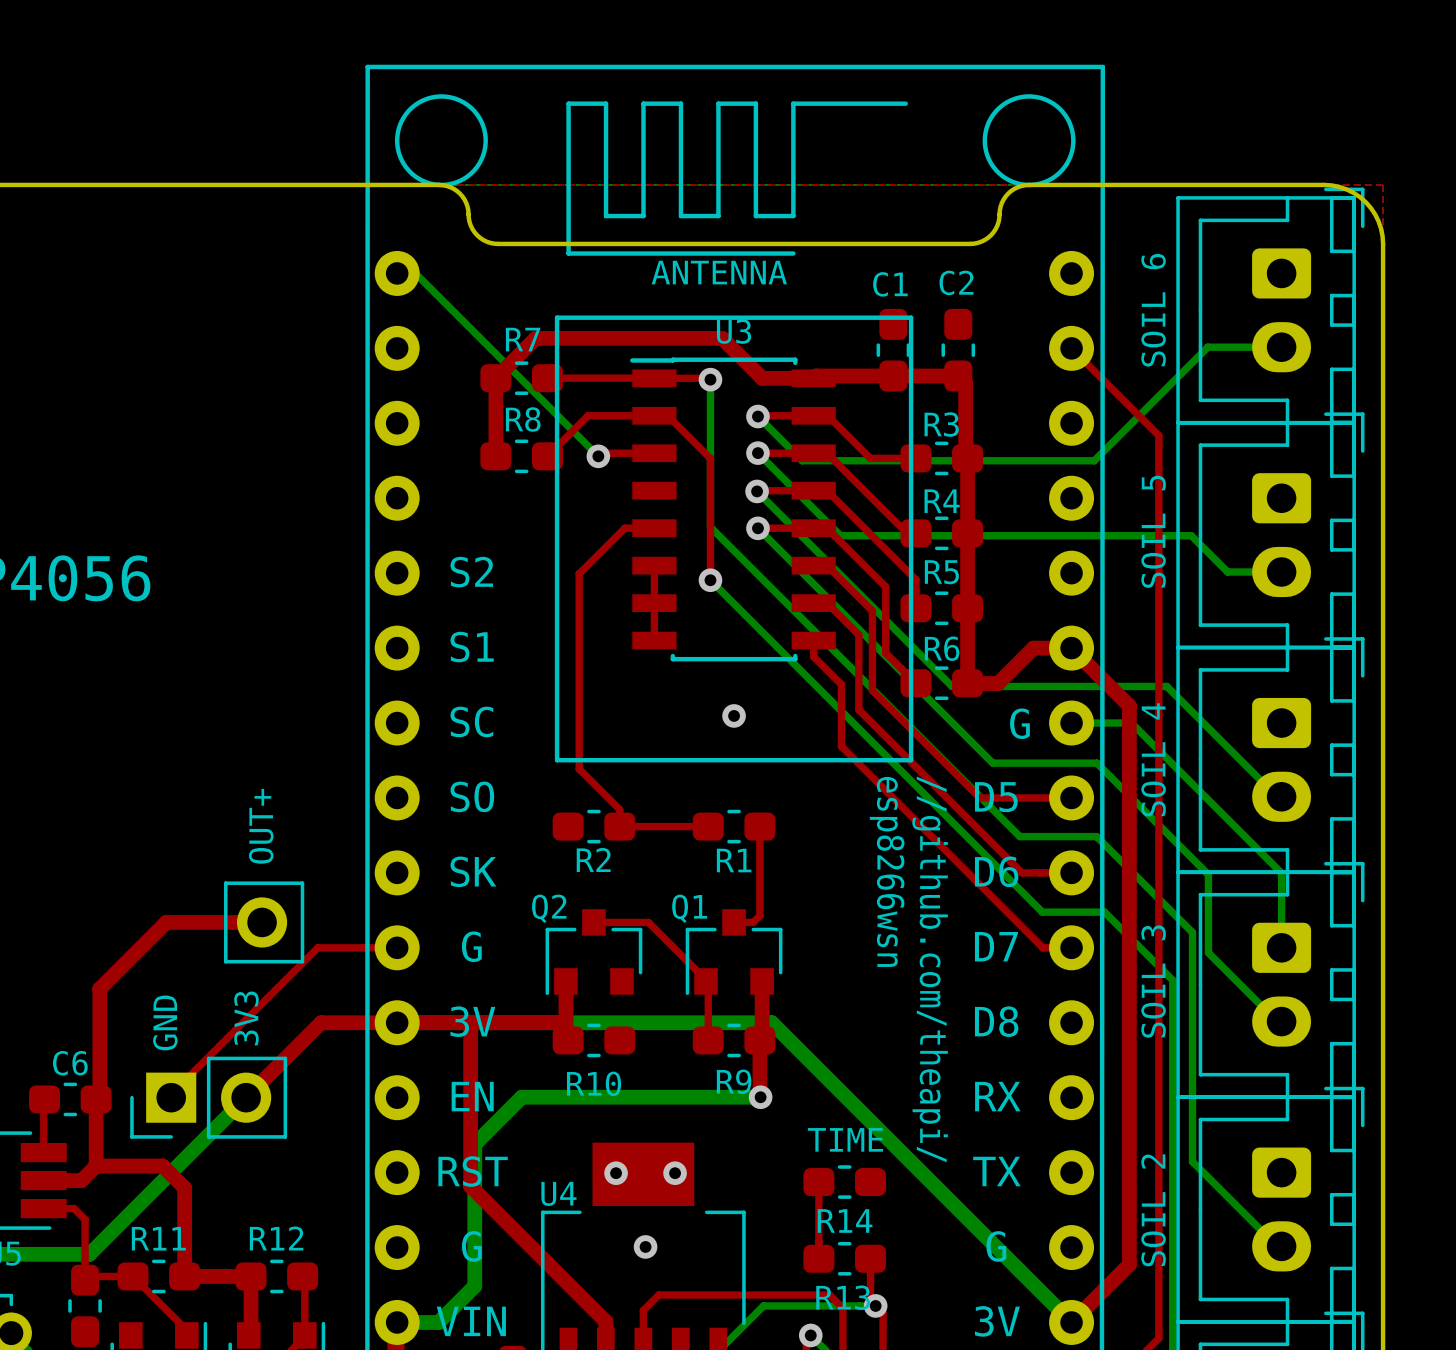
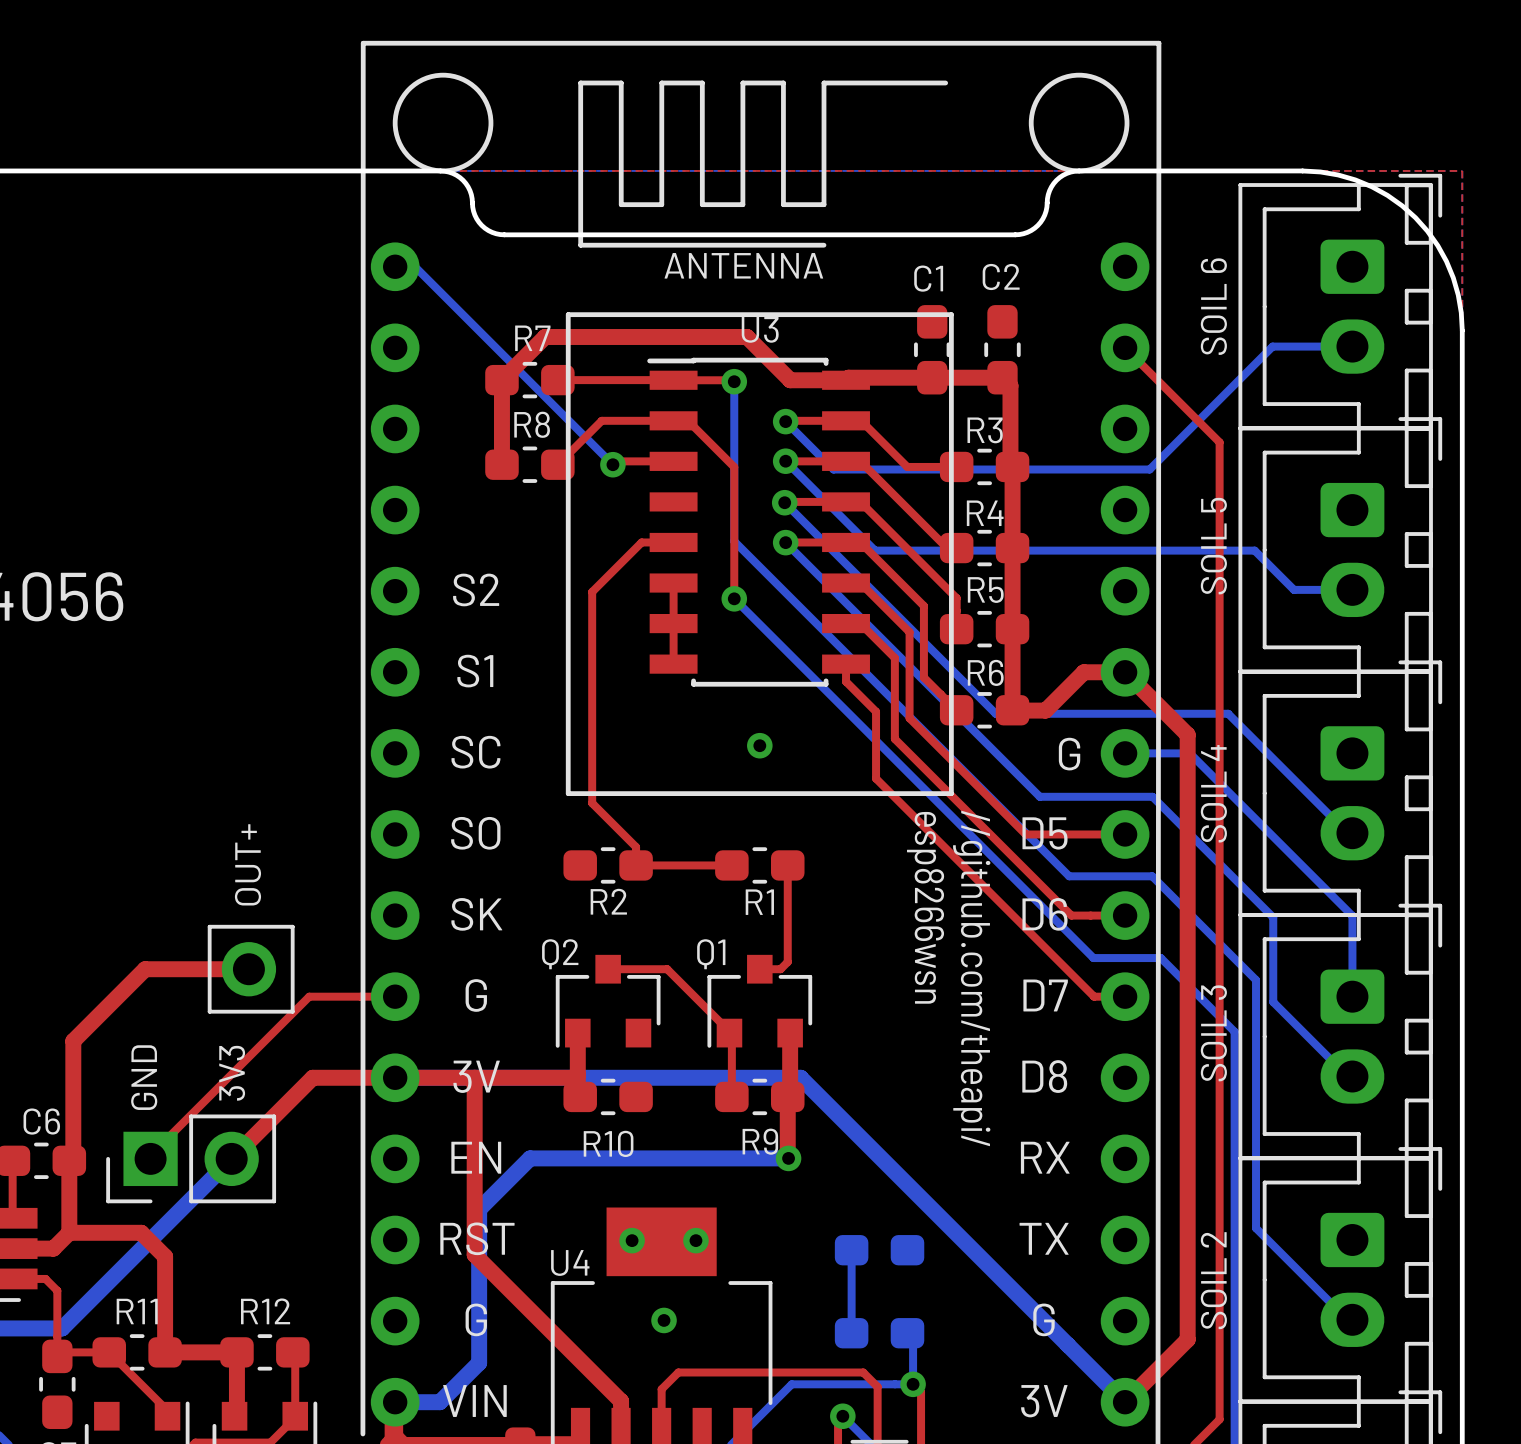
board edge: (1235, 184) (1331, 185) (1353, 192) (1365, 202) (1378, 221) (1382, 236) (1383, 332) -> (1302, 170) (1320, 171) (1355, 179) (1387, 195) (1415, 217) (1437, 245) (1453, 277) (1461, 312) (1462, 330)
text: TIME (845, 1139) -> none
top track: (818, 1182) (818, 1258) -> none
bottom track: none -> (851, 1250) (851, 1333)
R14 side: top (844, 1182) -> bottom (879, 1250)
R13 side: top (844, 1258) -> bottom (879, 1333)
top track: (870, 1258) (870, 1300) -> none
bottom track: none -> (907, 1333) (913, 1338) (913, 1384)

